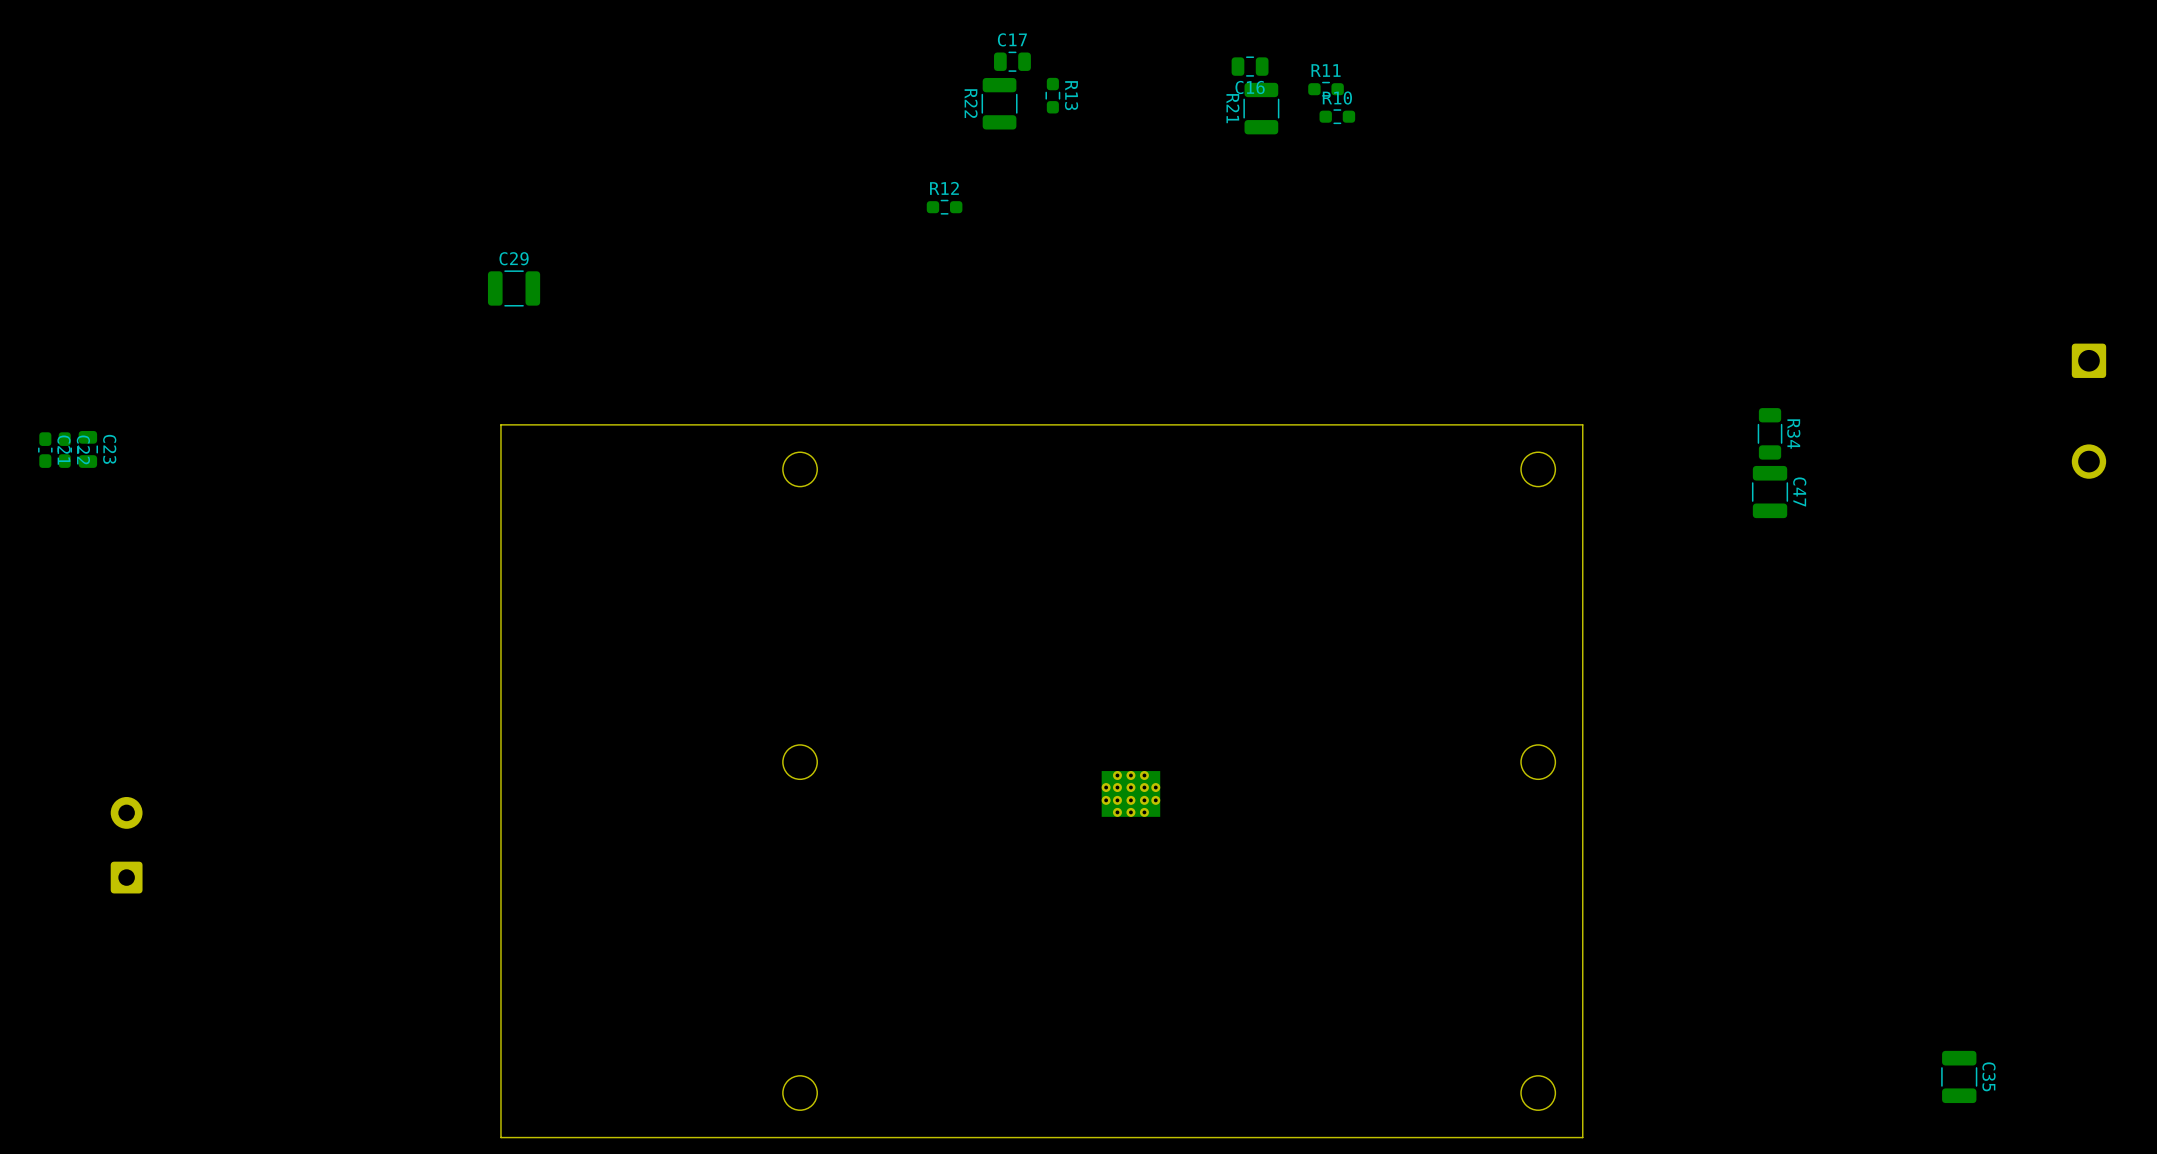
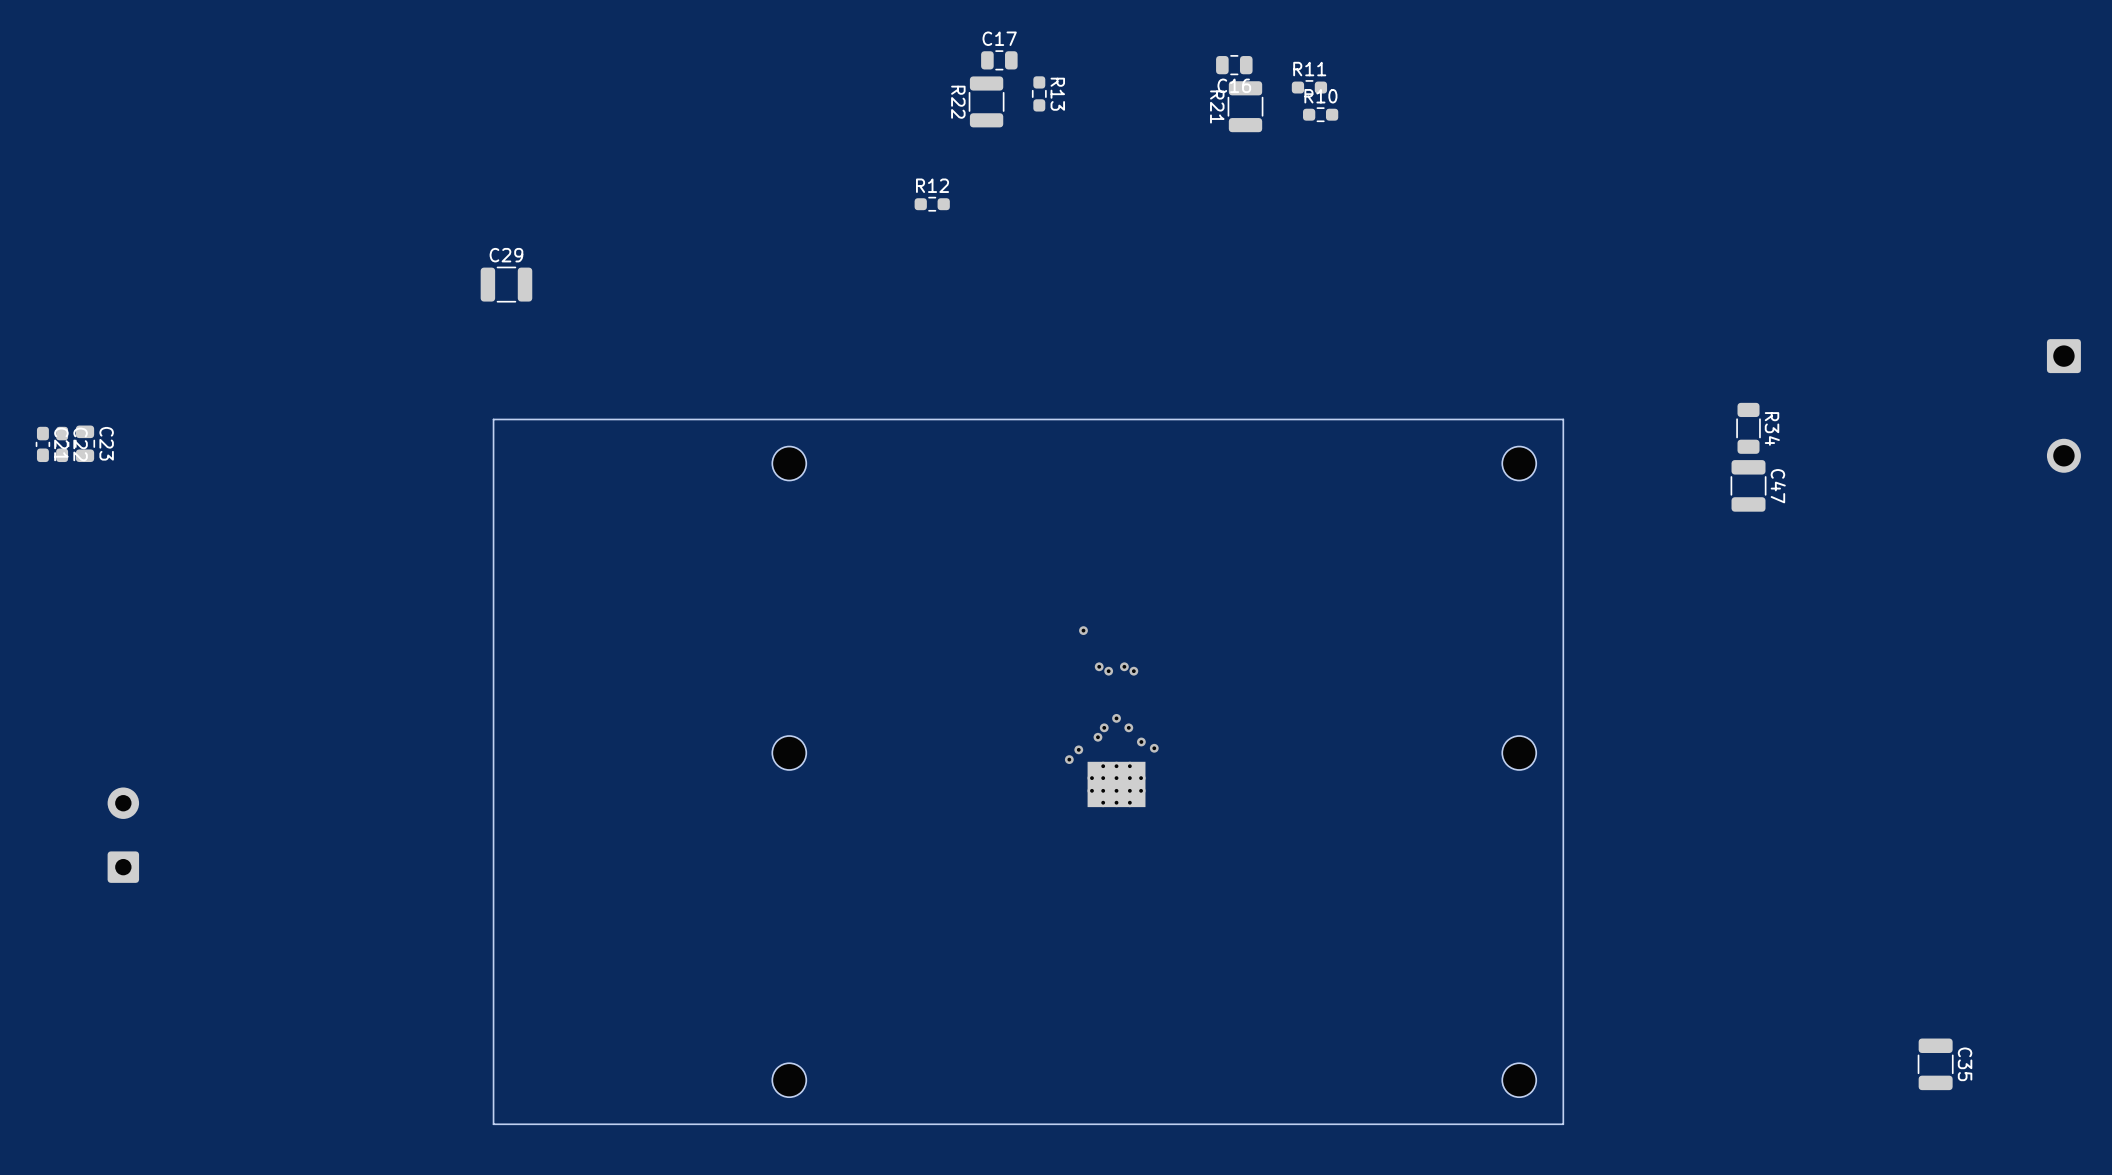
via: none -> (1083, 630)
via: none -> (1099, 666)
via: none -> (1124, 666)
via: none -> (1108, 671)
via: none -> (1133, 671)
via: none -> (1116, 718)
via: none -> (1104, 727)
via: none -> (1128, 727)
via: none -> (1097, 737)
via: none -> (1141, 741)
via: none -> (1154, 748)
via: none -> (1078, 749)
via: none -> (1069, 759)

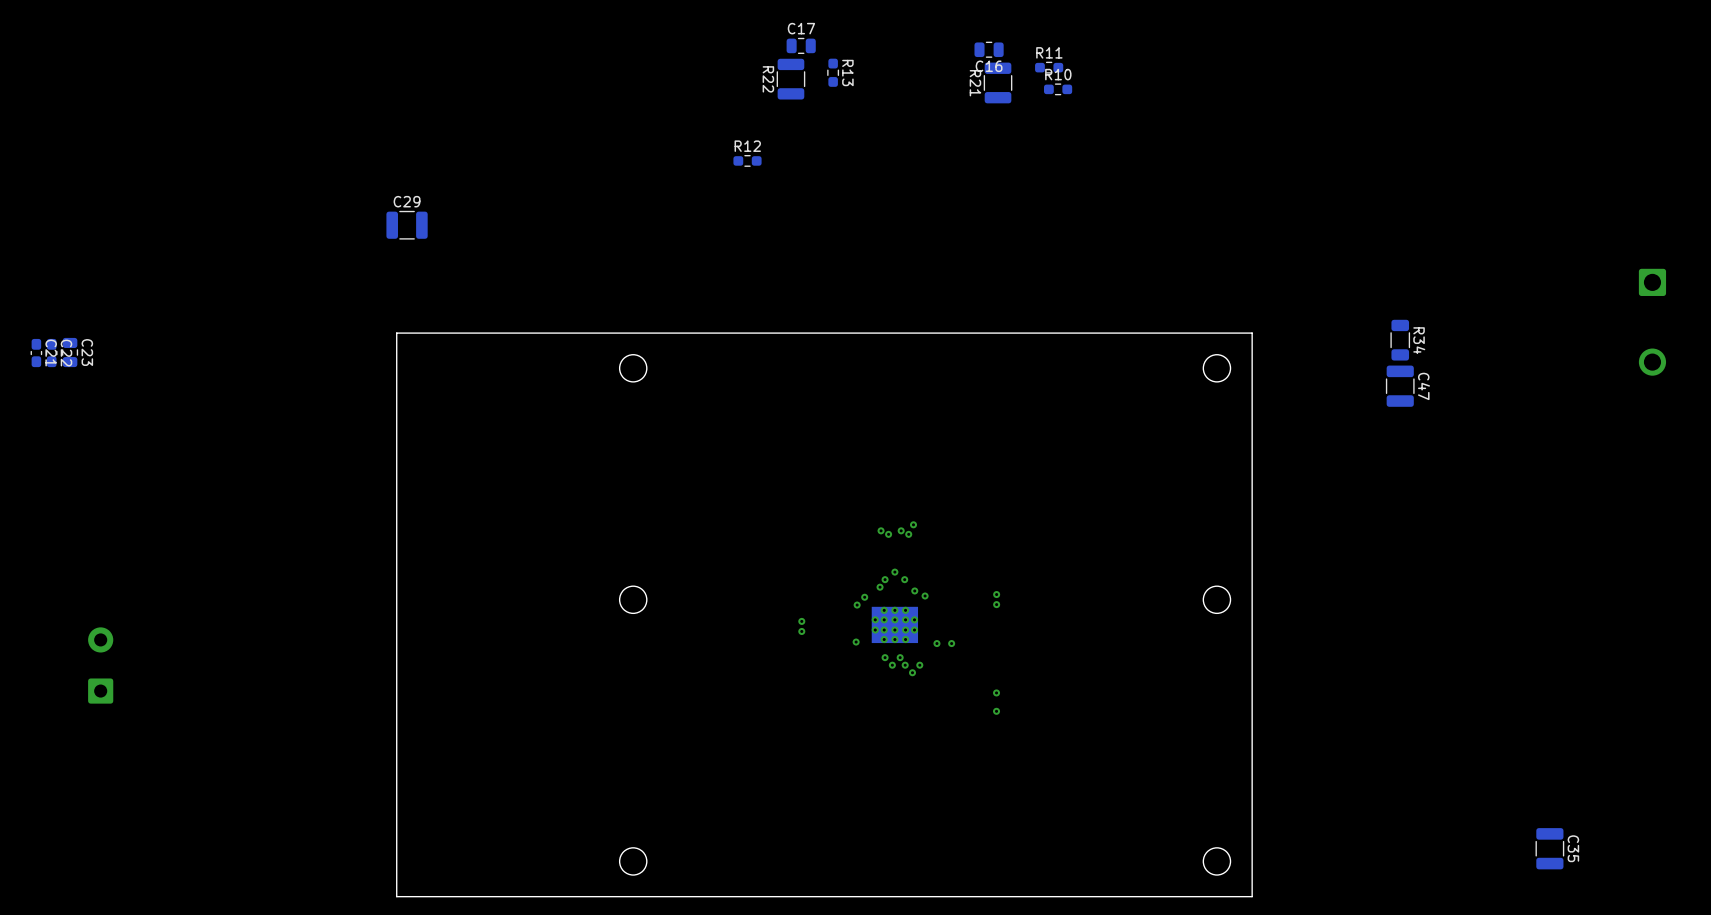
via position: (1083, 630) -> (913, 524)
via: none -> (996, 594)
via: none -> (996, 604)
via: none -> (801, 621)
via: none -> (801, 631)
via: none -> (856, 642)
via: none -> (936, 643)
via: none -> (951, 643)
via: none -> (885, 657)
via: none -> (900, 657)
via: none -> (892, 665)
via: none -> (905, 665)
via: none -> (919, 665)
via: none -> (912, 672)
via: none -> (996, 692)
via: none -> (996, 711)

